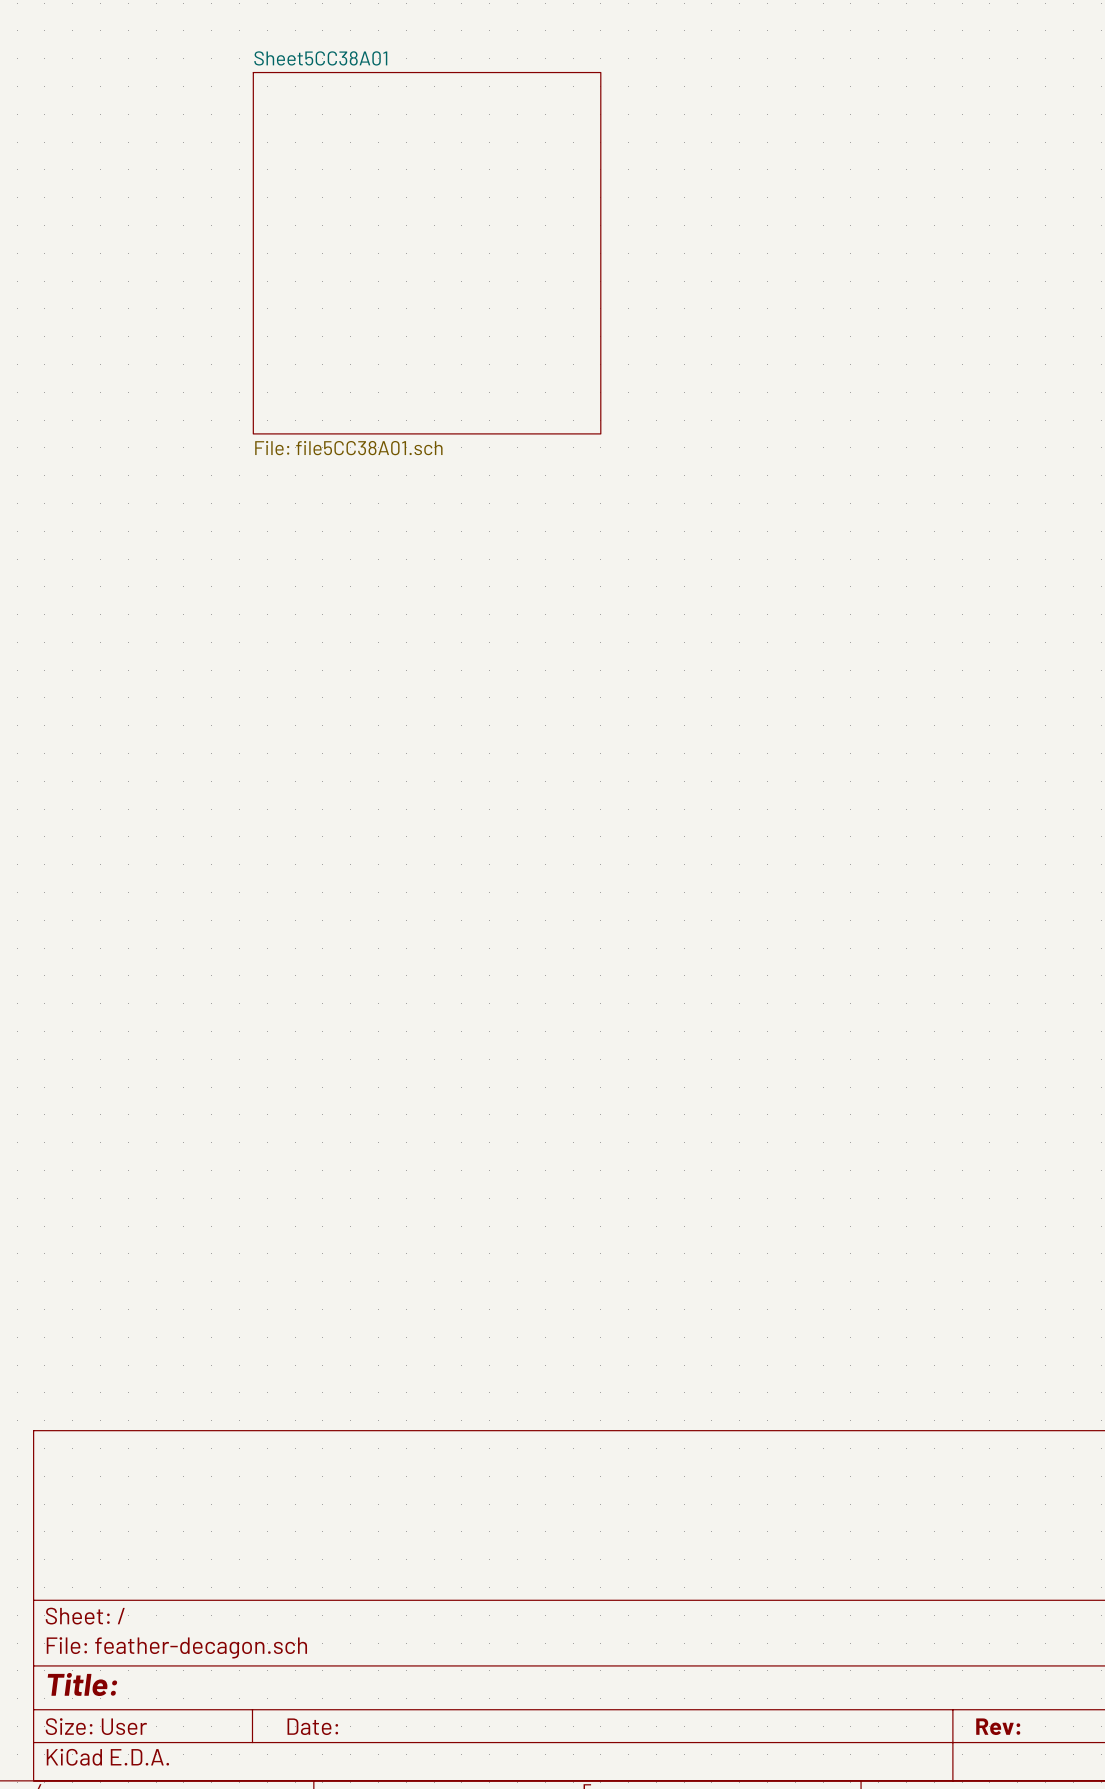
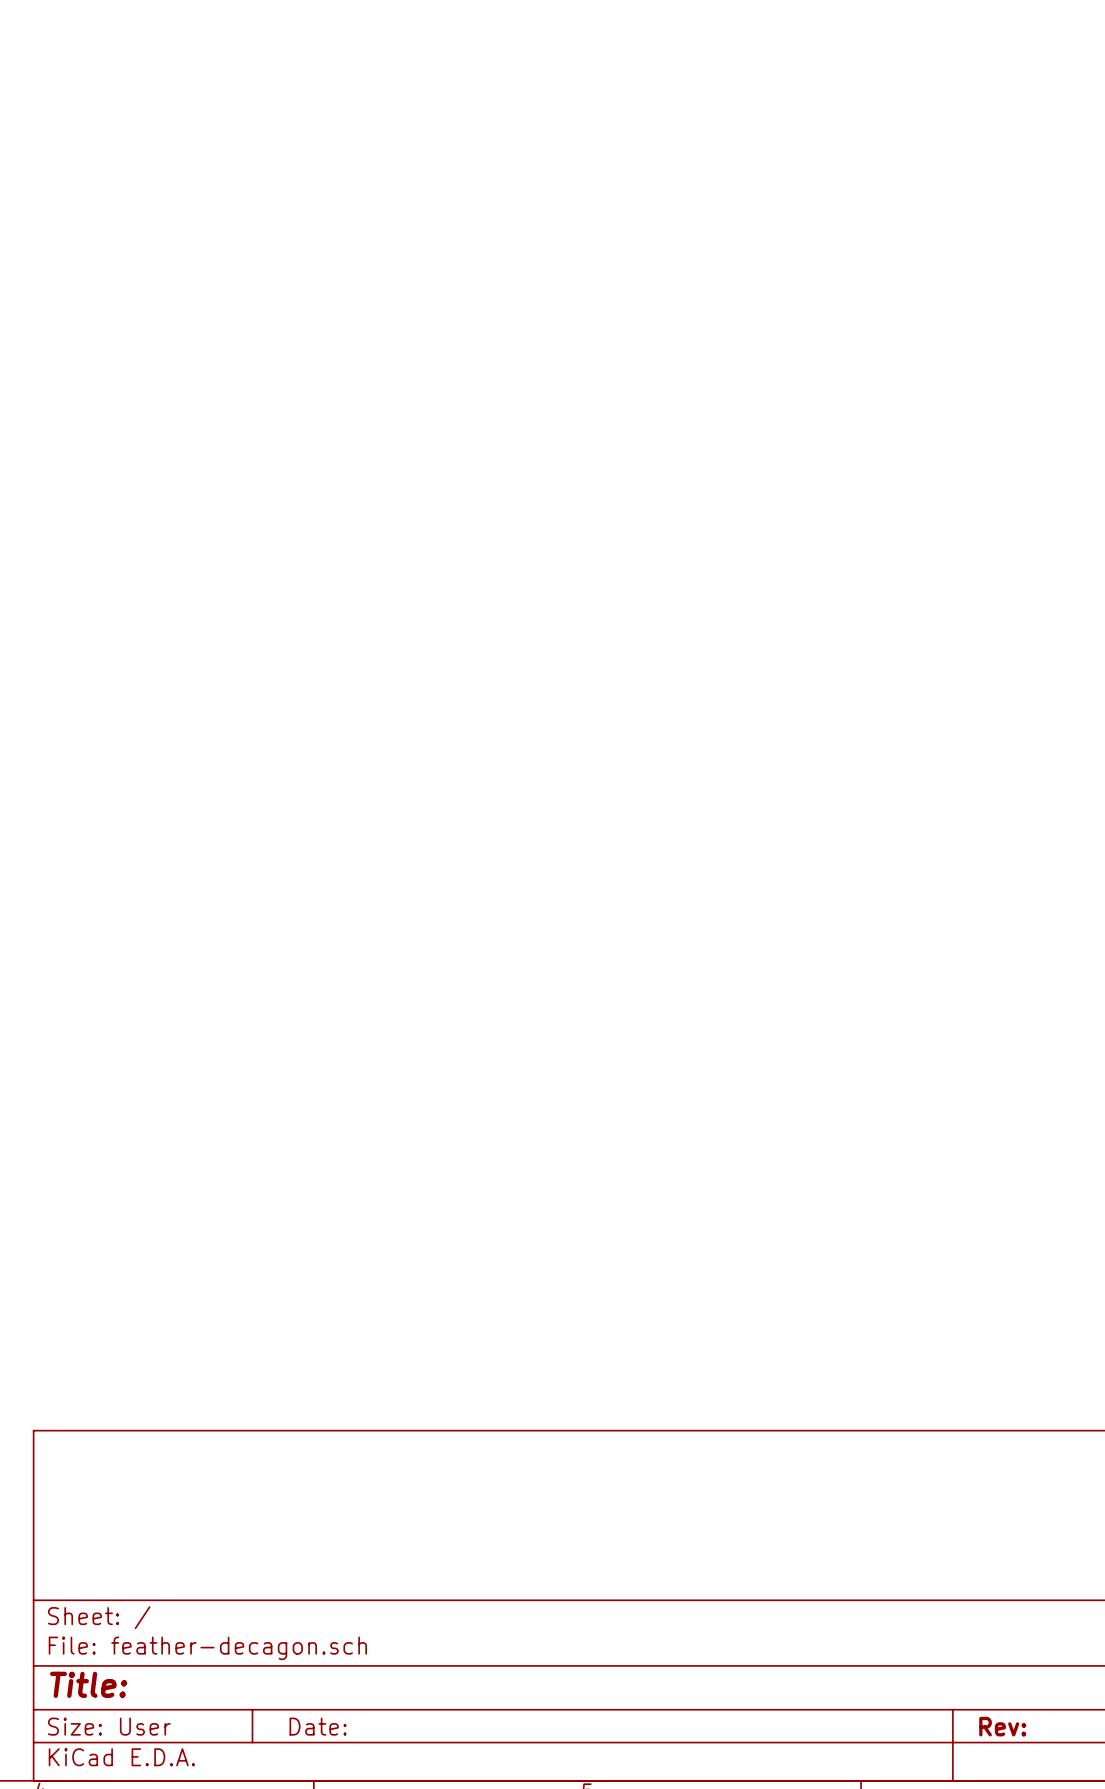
sheet Sheet5CC38A01: File: file5CC38A01.sch (427, 253) -> none

